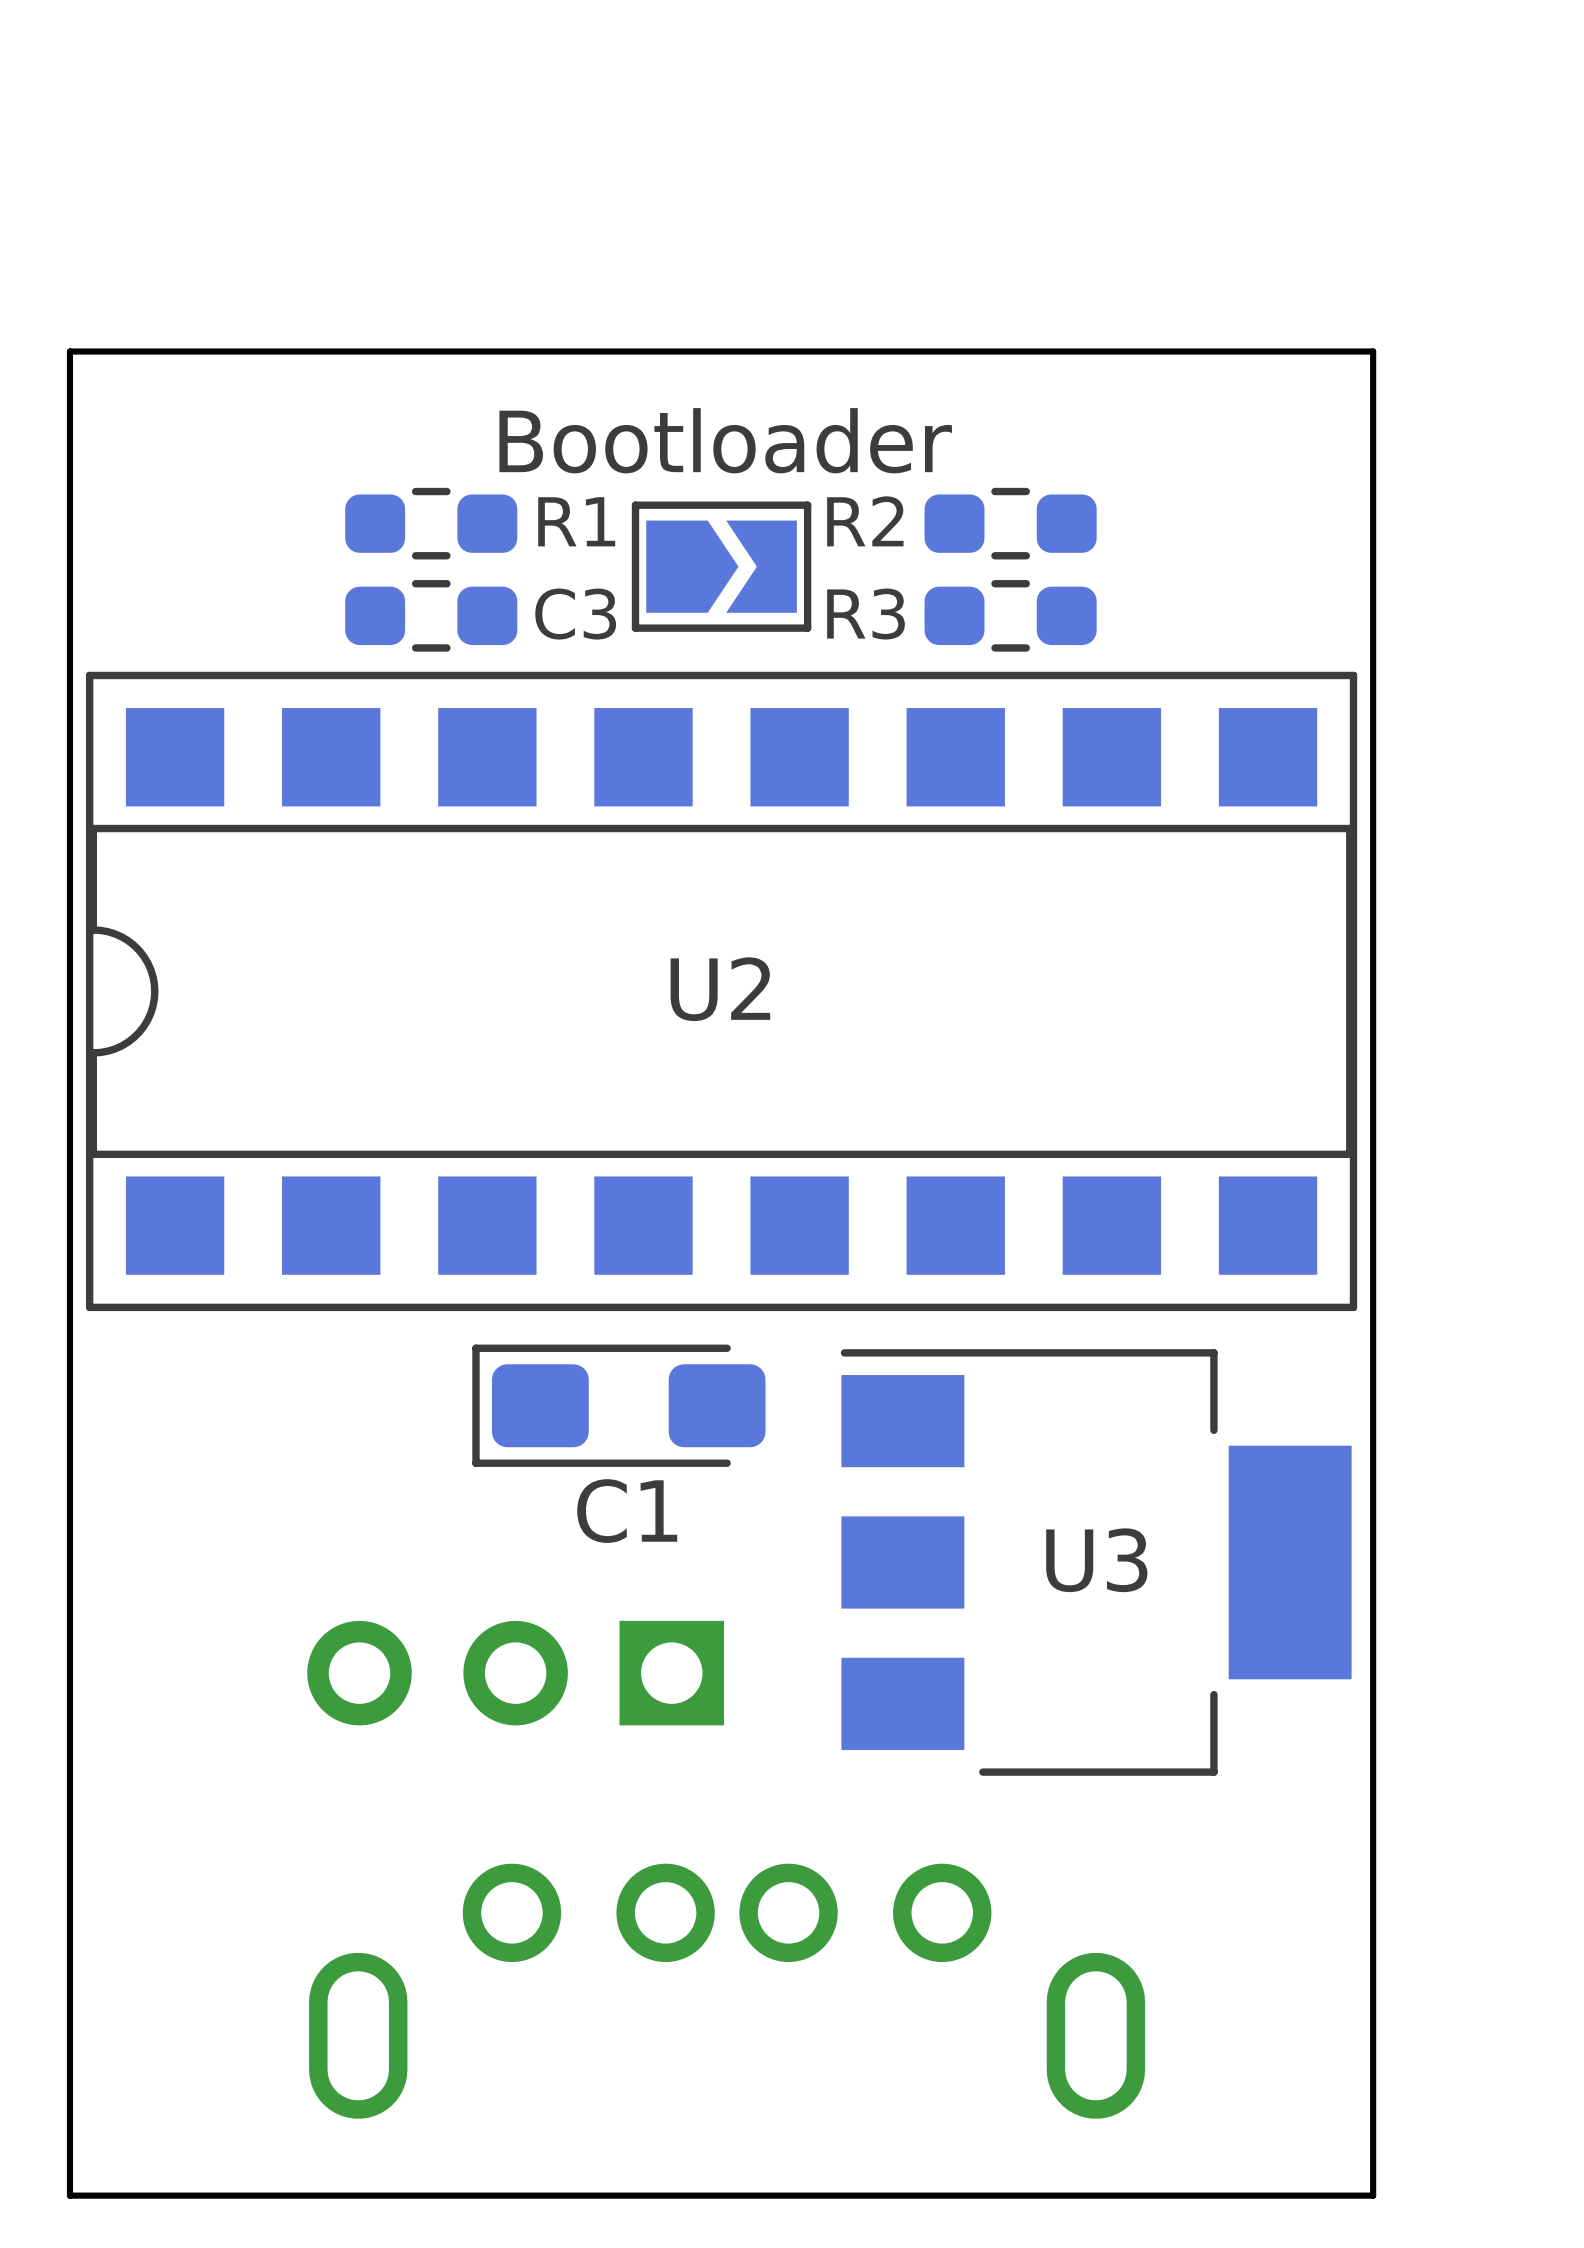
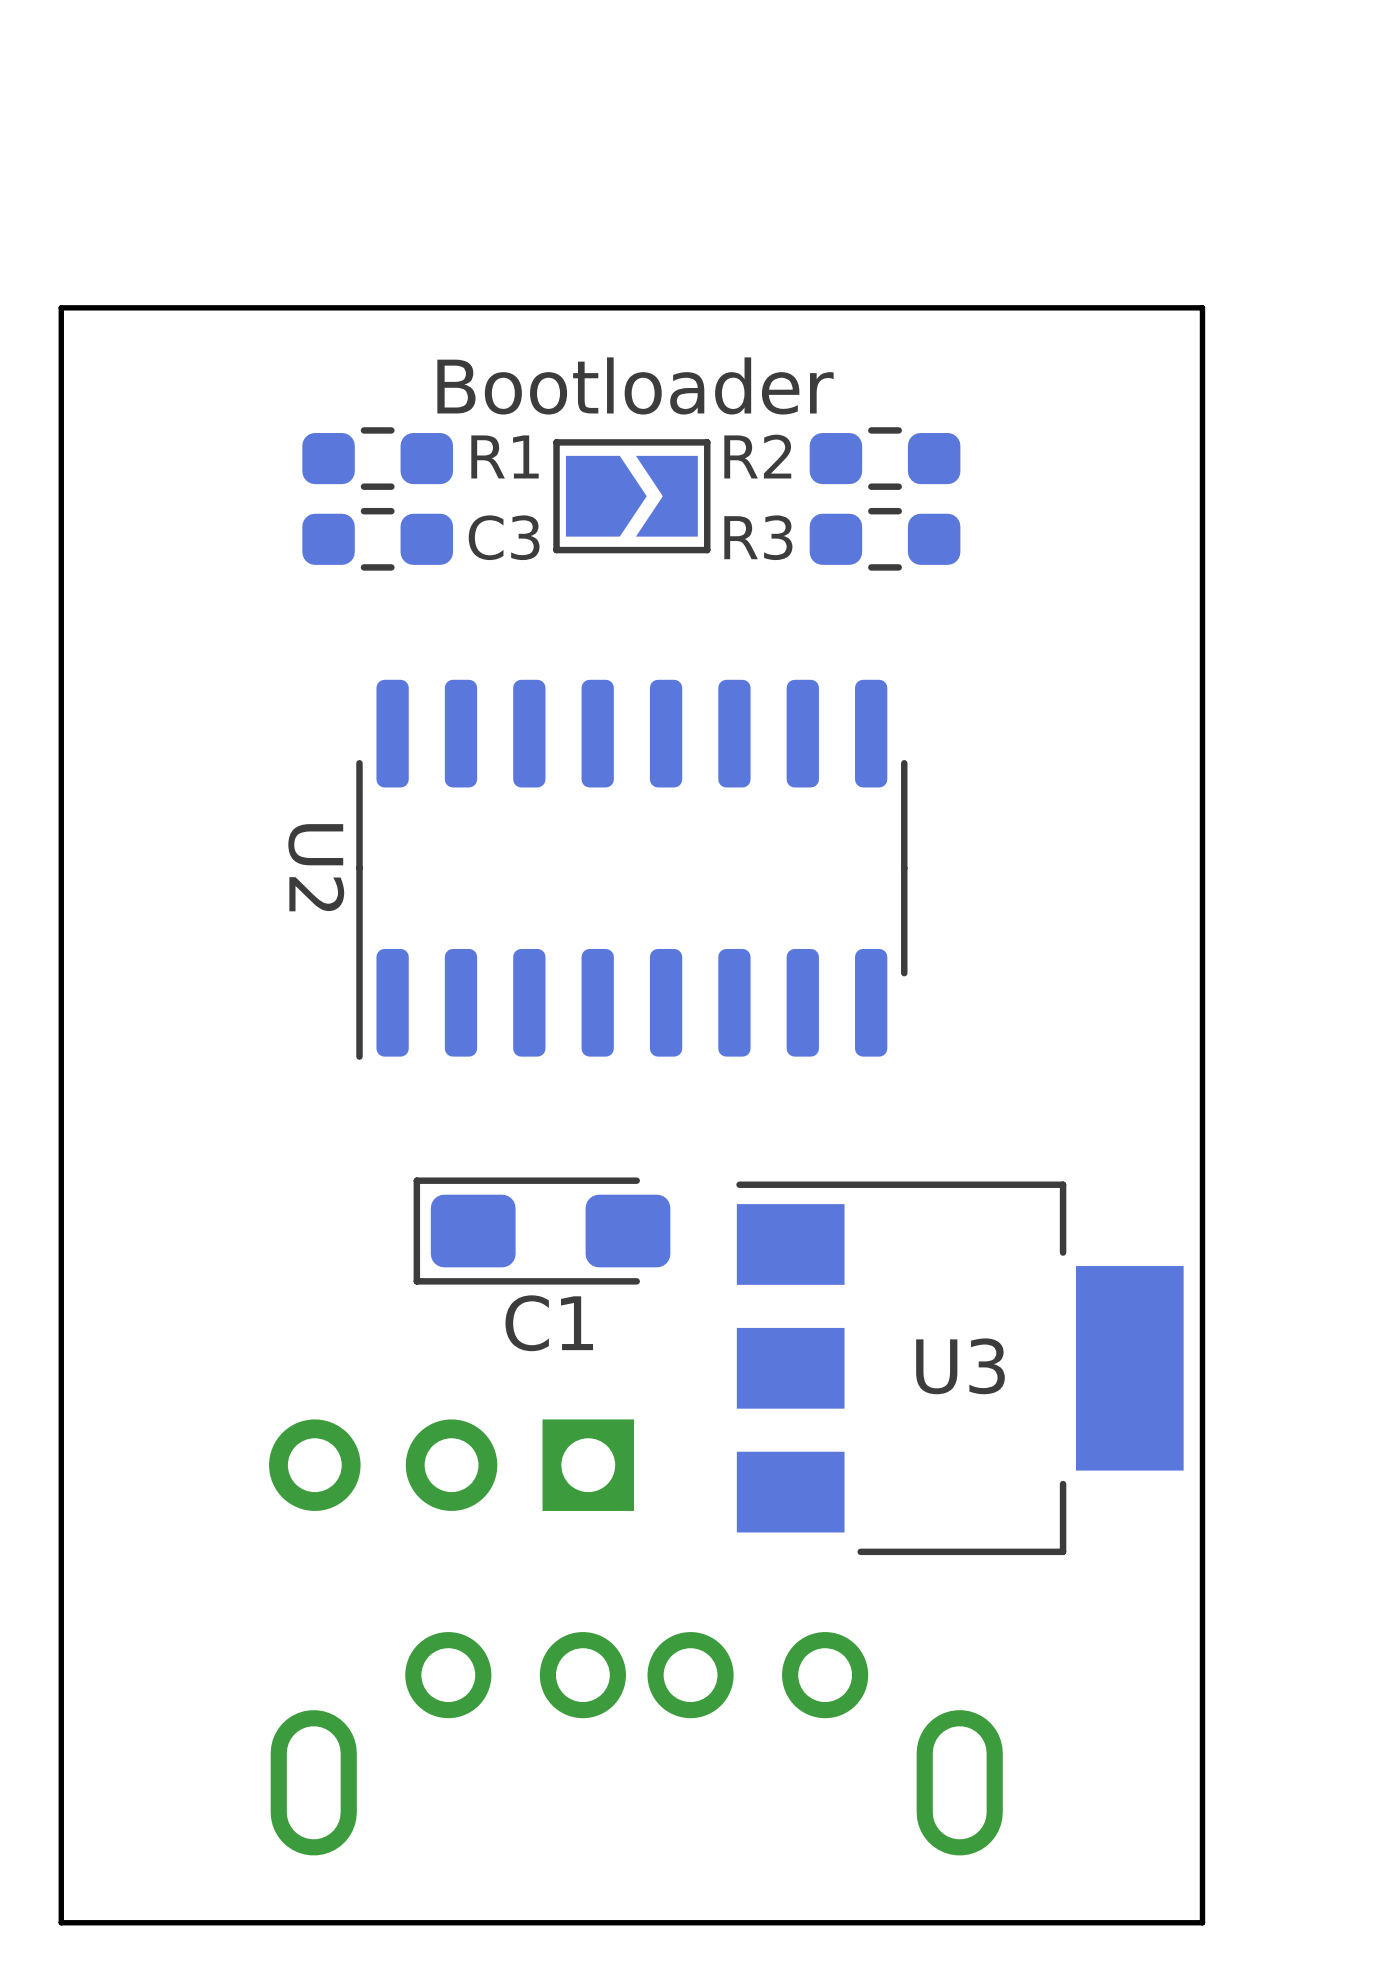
U2 footprint: [85, 671, 1358, 1312] -> [356, 679, 908, 1060]
U2 name position: U2 (720, 989) -> U2 (316, 867)

